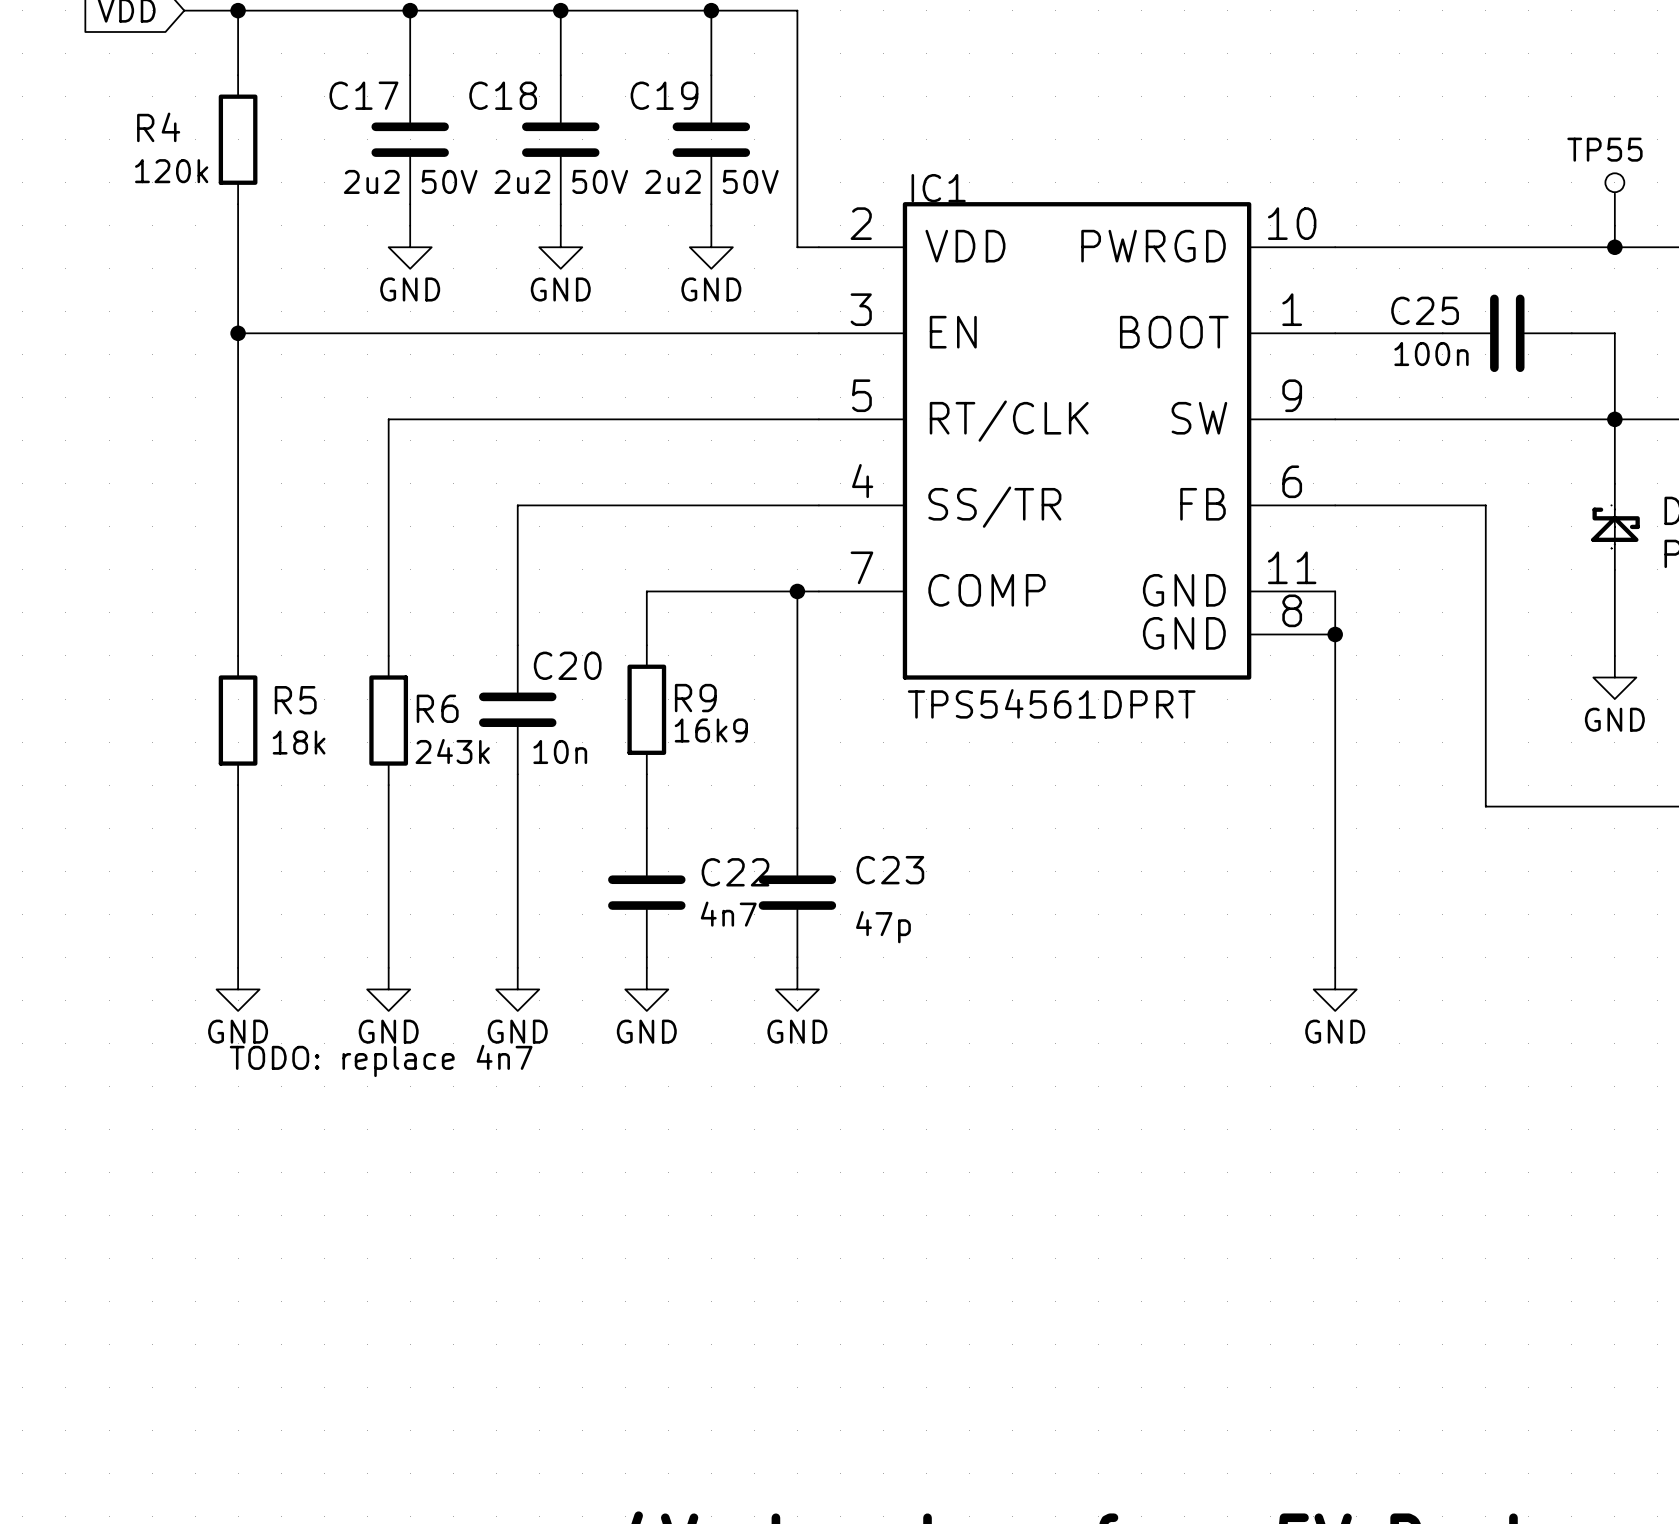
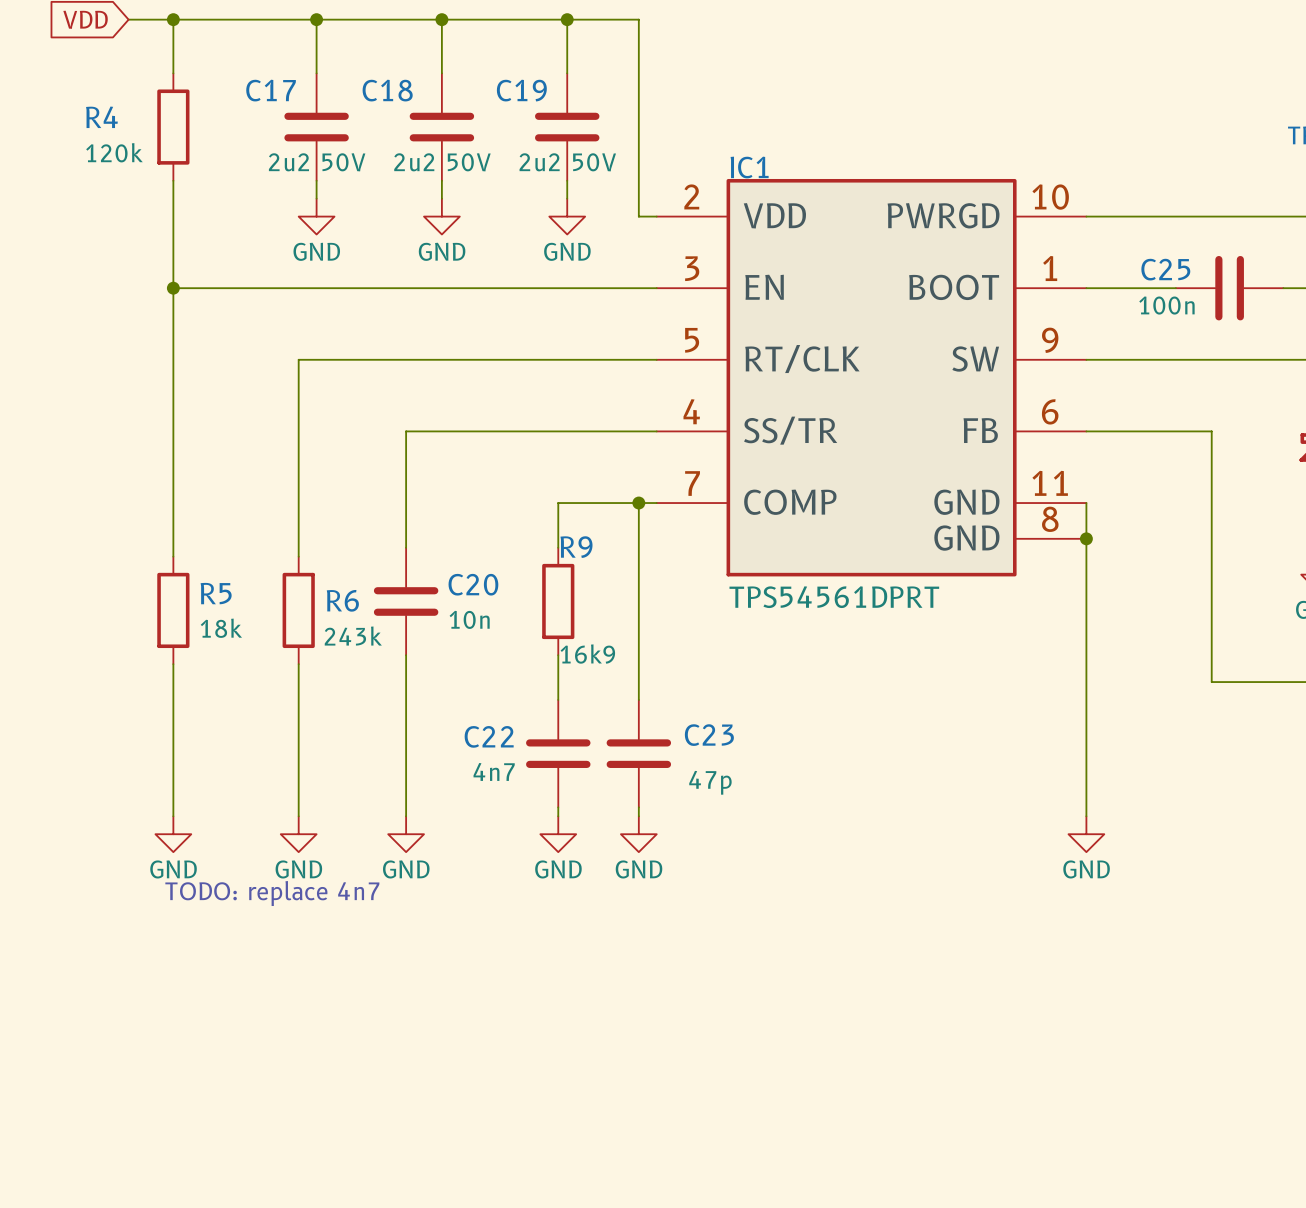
wire: (700, 591) (646, 591) (646, 645) -> (558, 503) (558, 547)
C20 name position: C20 (567, 665) -> C20 (473, 584)
R9 name position: R9 (695, 698) -> R9 (576, 547)
R9 position: (646, 709) -> (558, 601)
R9 text position: 16k9 (711, 730) -> 16k9 (587, 654)
C20 text position: 10n (560, 752) -> 10n (469, 619)
wire: (646, 774) (646, 828) -> (558, 655) (558, 699)
C22 name position: C22 (735, 872) -> C22 (489, 736)
C22 position: (646, 892) -> (558, 753)
C22 text position: 4n7 (728, 914) -> 4n7 (494, 771)
wire: (646, 957) (646, 967) -> (558, 807) (558, 816)
power symbol position: GND (646, 989) -> GND (558, 834)

